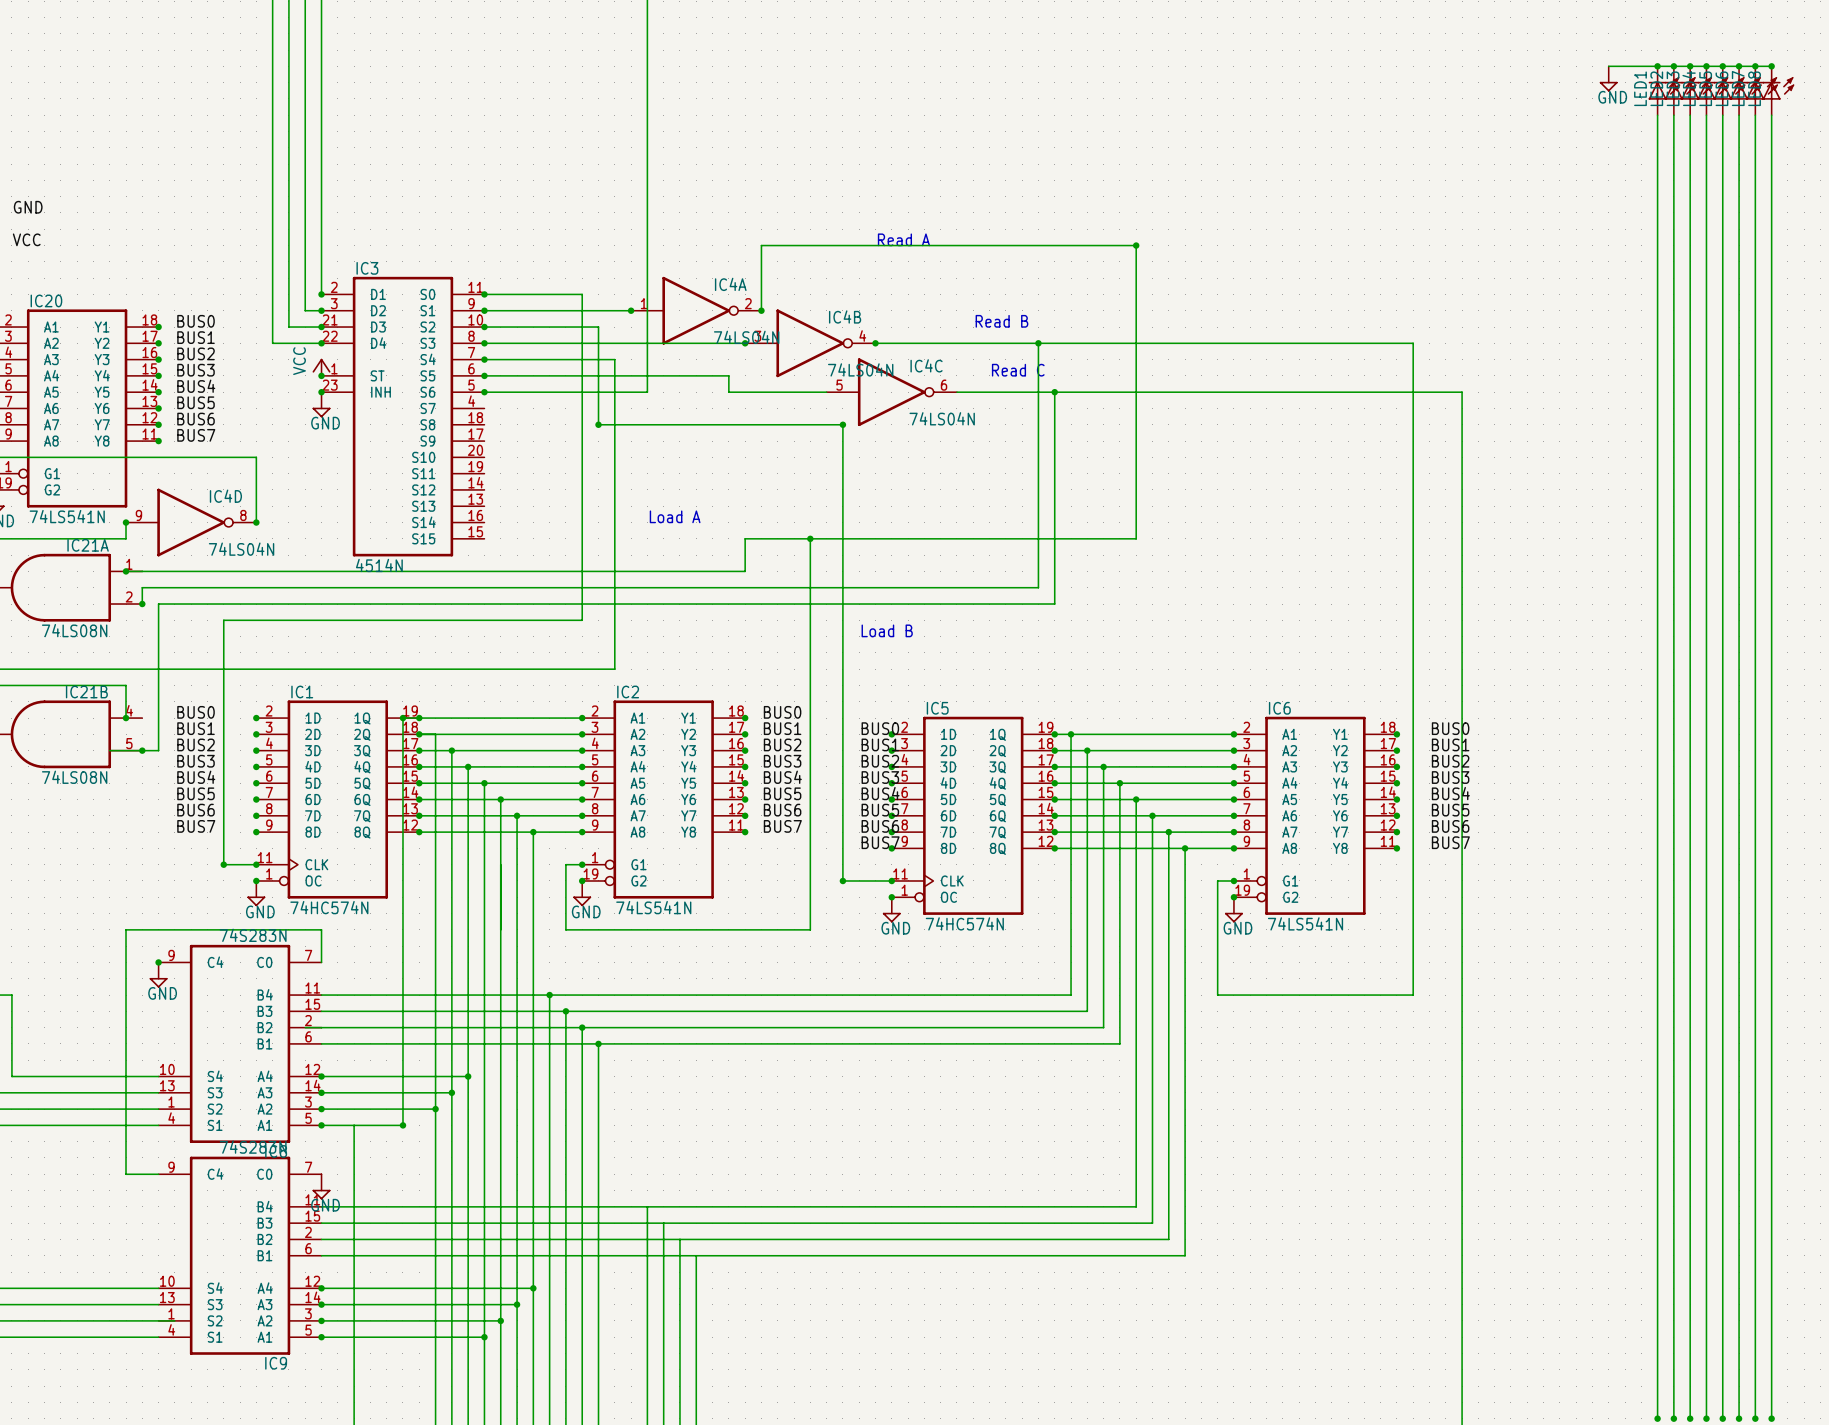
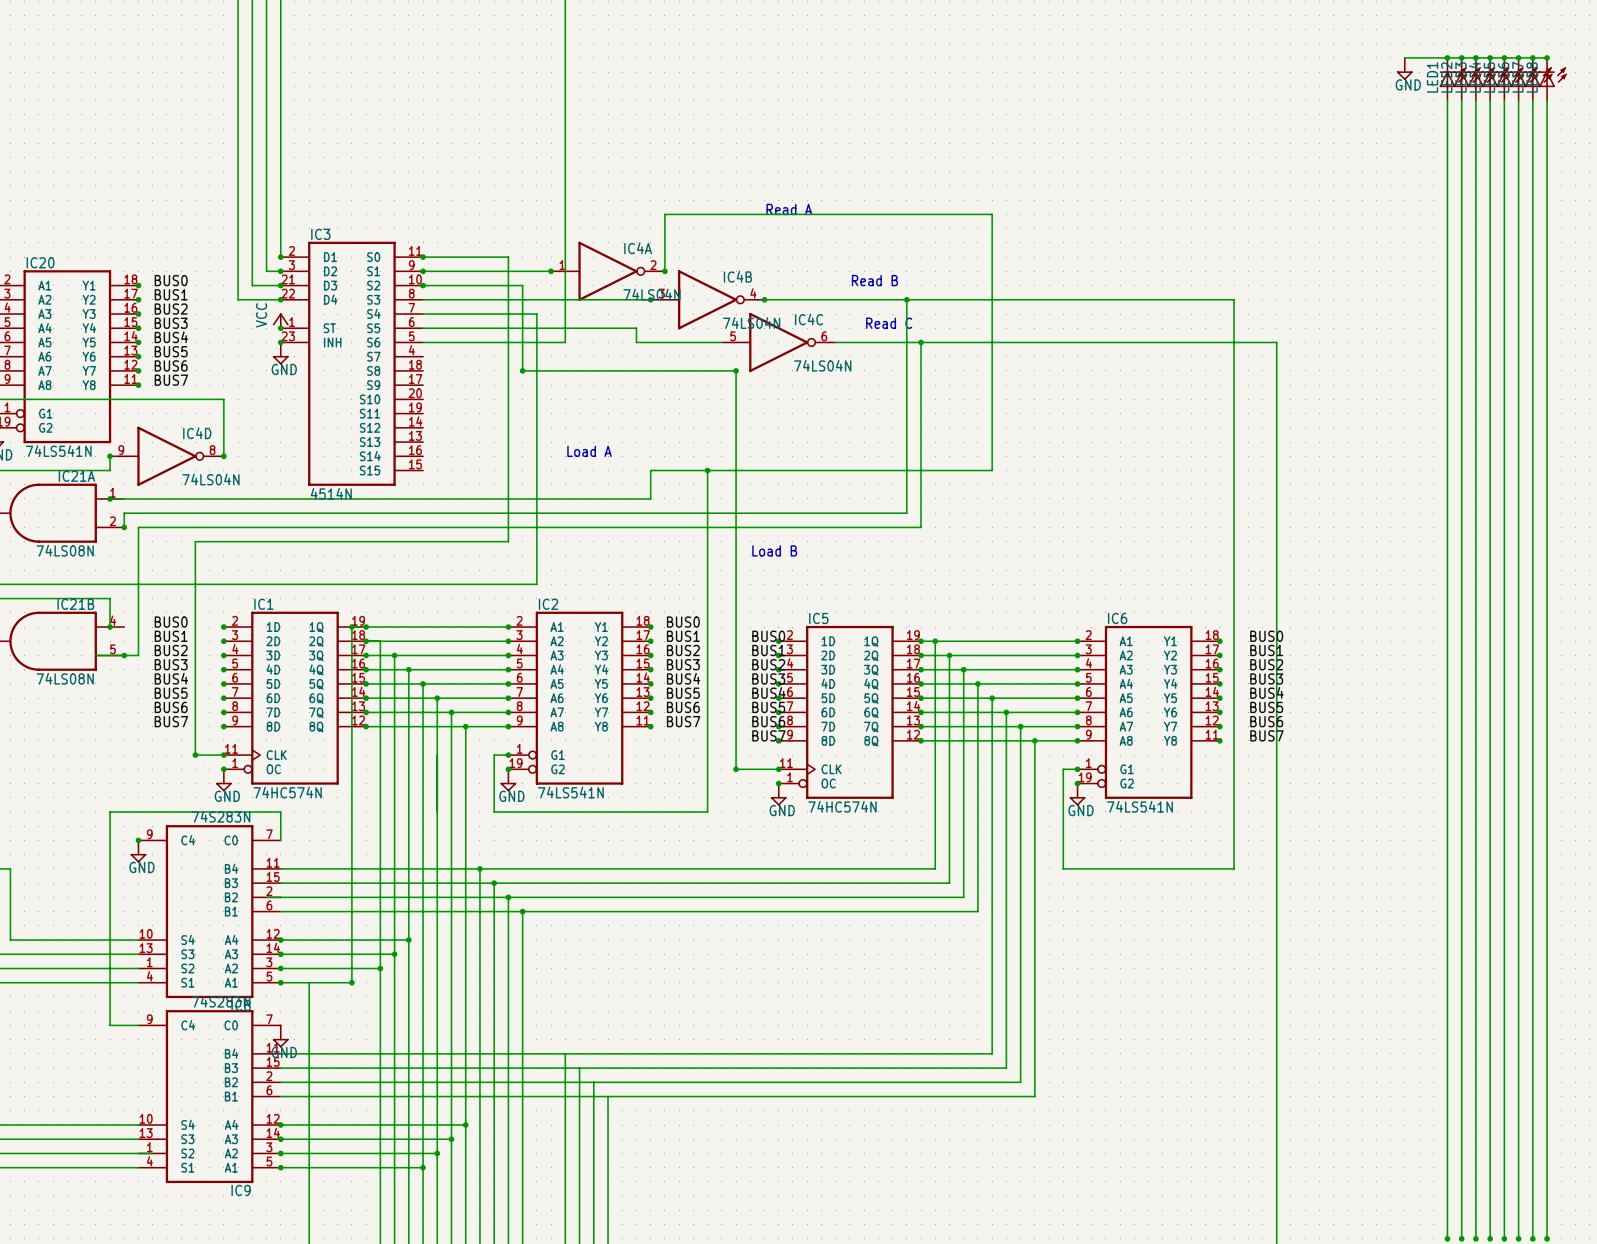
label: GND (28, 207) -> none
label: VCC (26, 239) -> none
junction: (1136, 245) -> none
junction: (484, 343) -> none
junction: (484, 359) -> none
junction: (484, 375) -> none
junction: (484, 392) -> none

